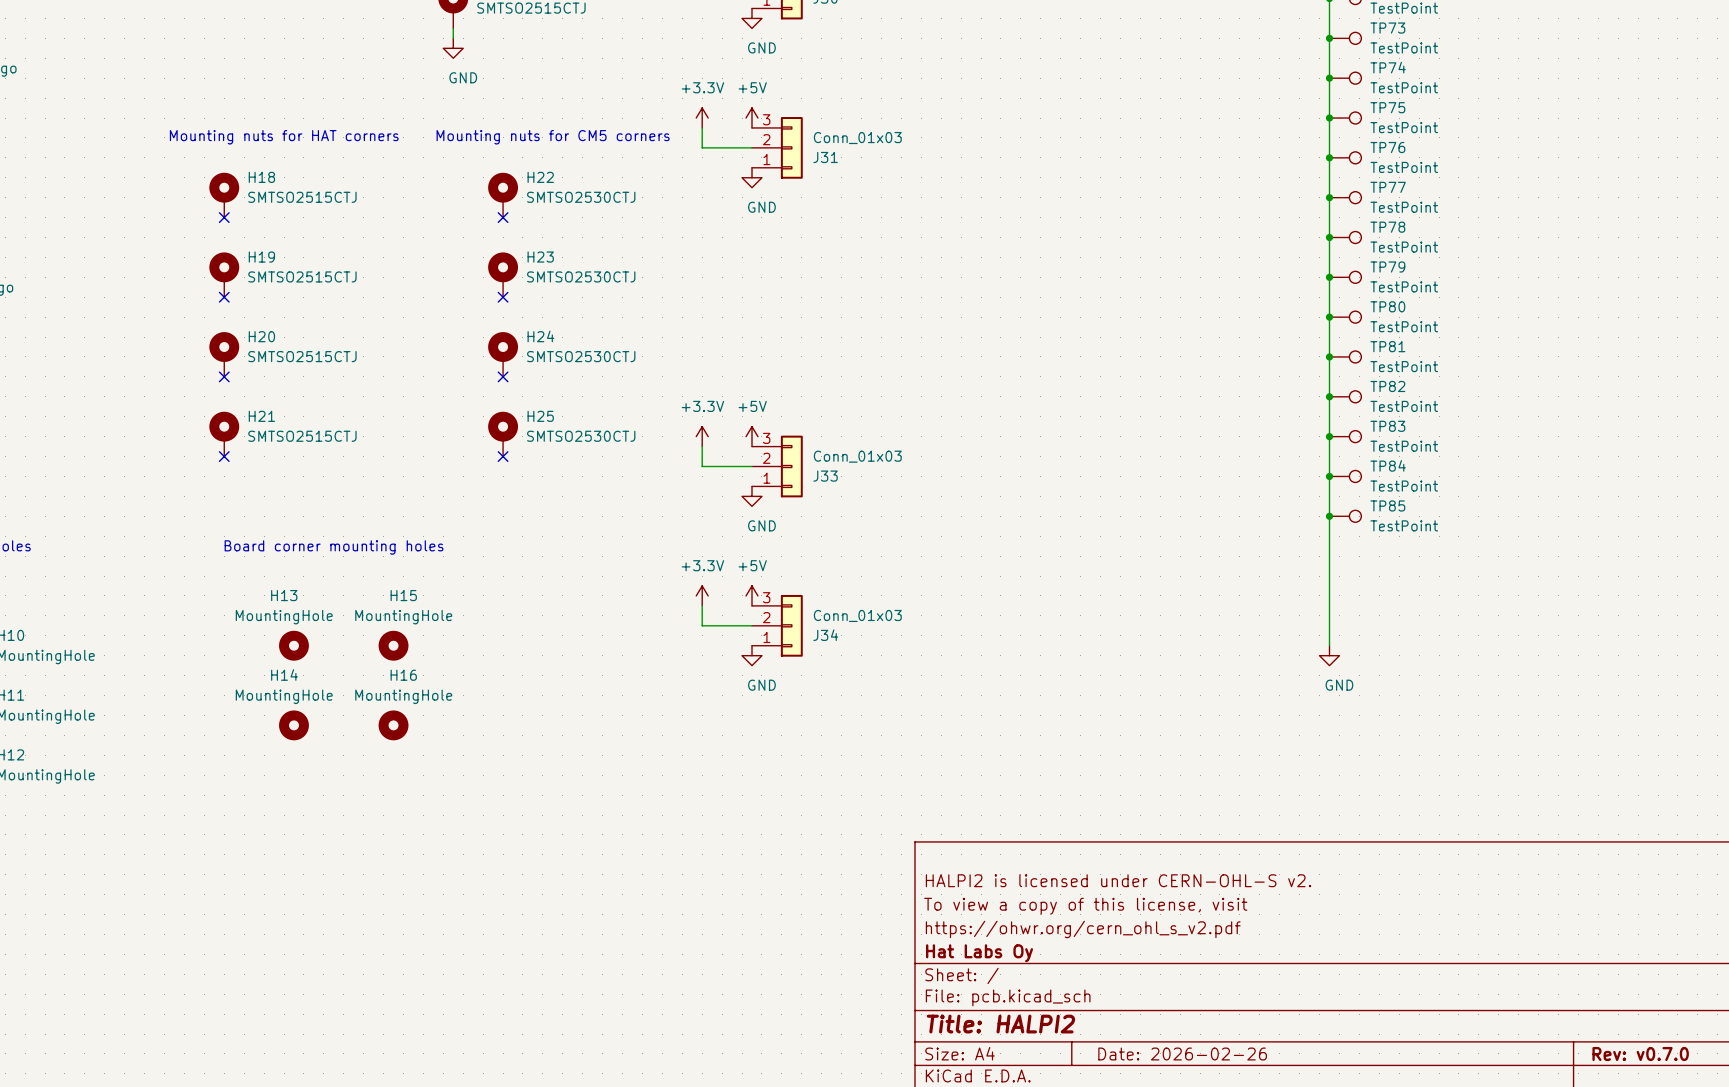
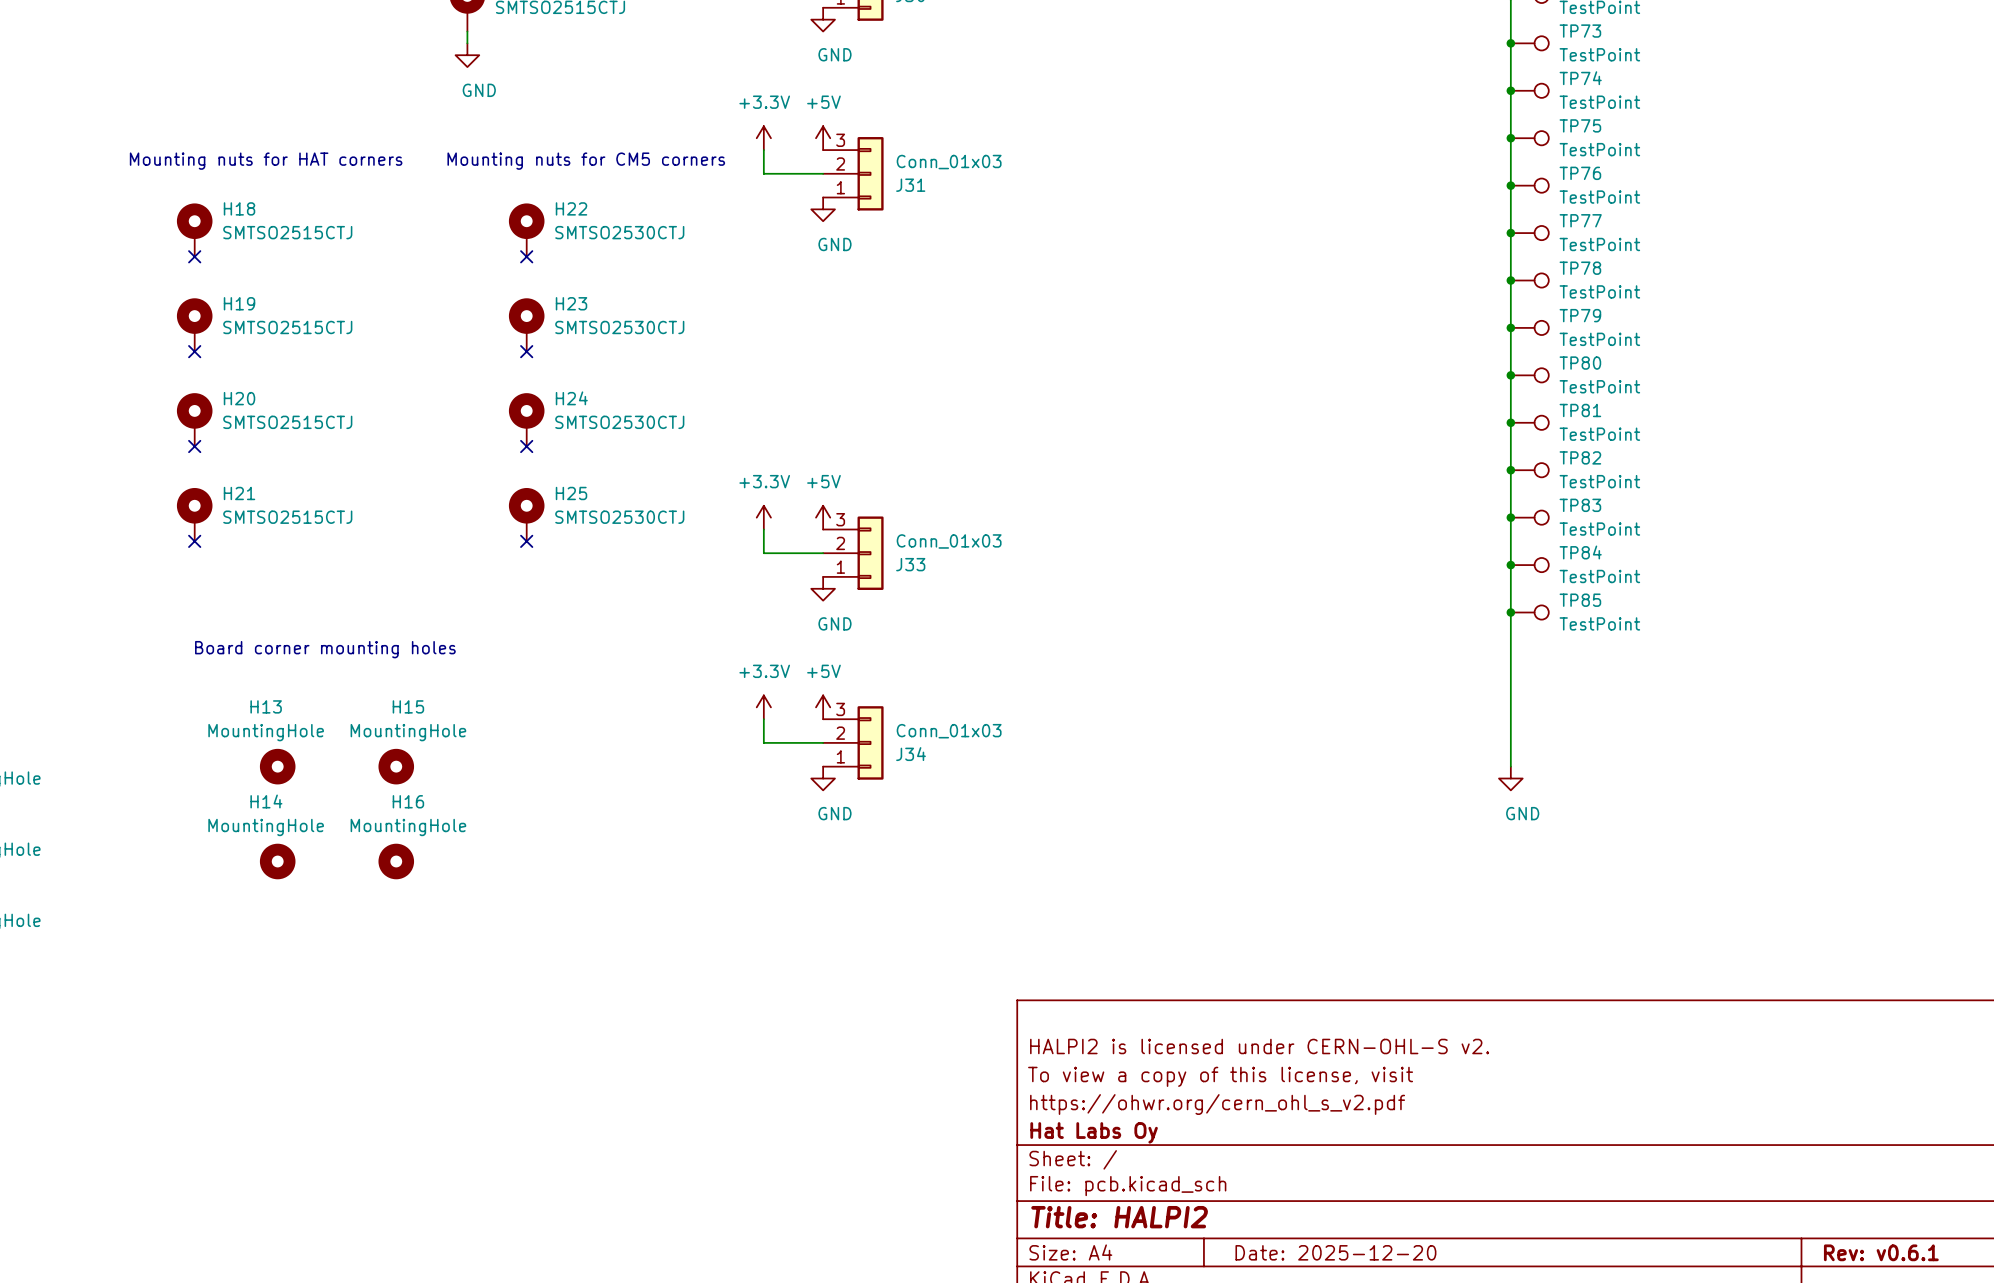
title block: Date: 2026-02-26 (1182, 1054) -> Date: 2025-12-20 (1335, 1252)
title block: Rev: v0.7.0 (1640, 1054) -> Rev: v0.6.1 (1881, 1252)

